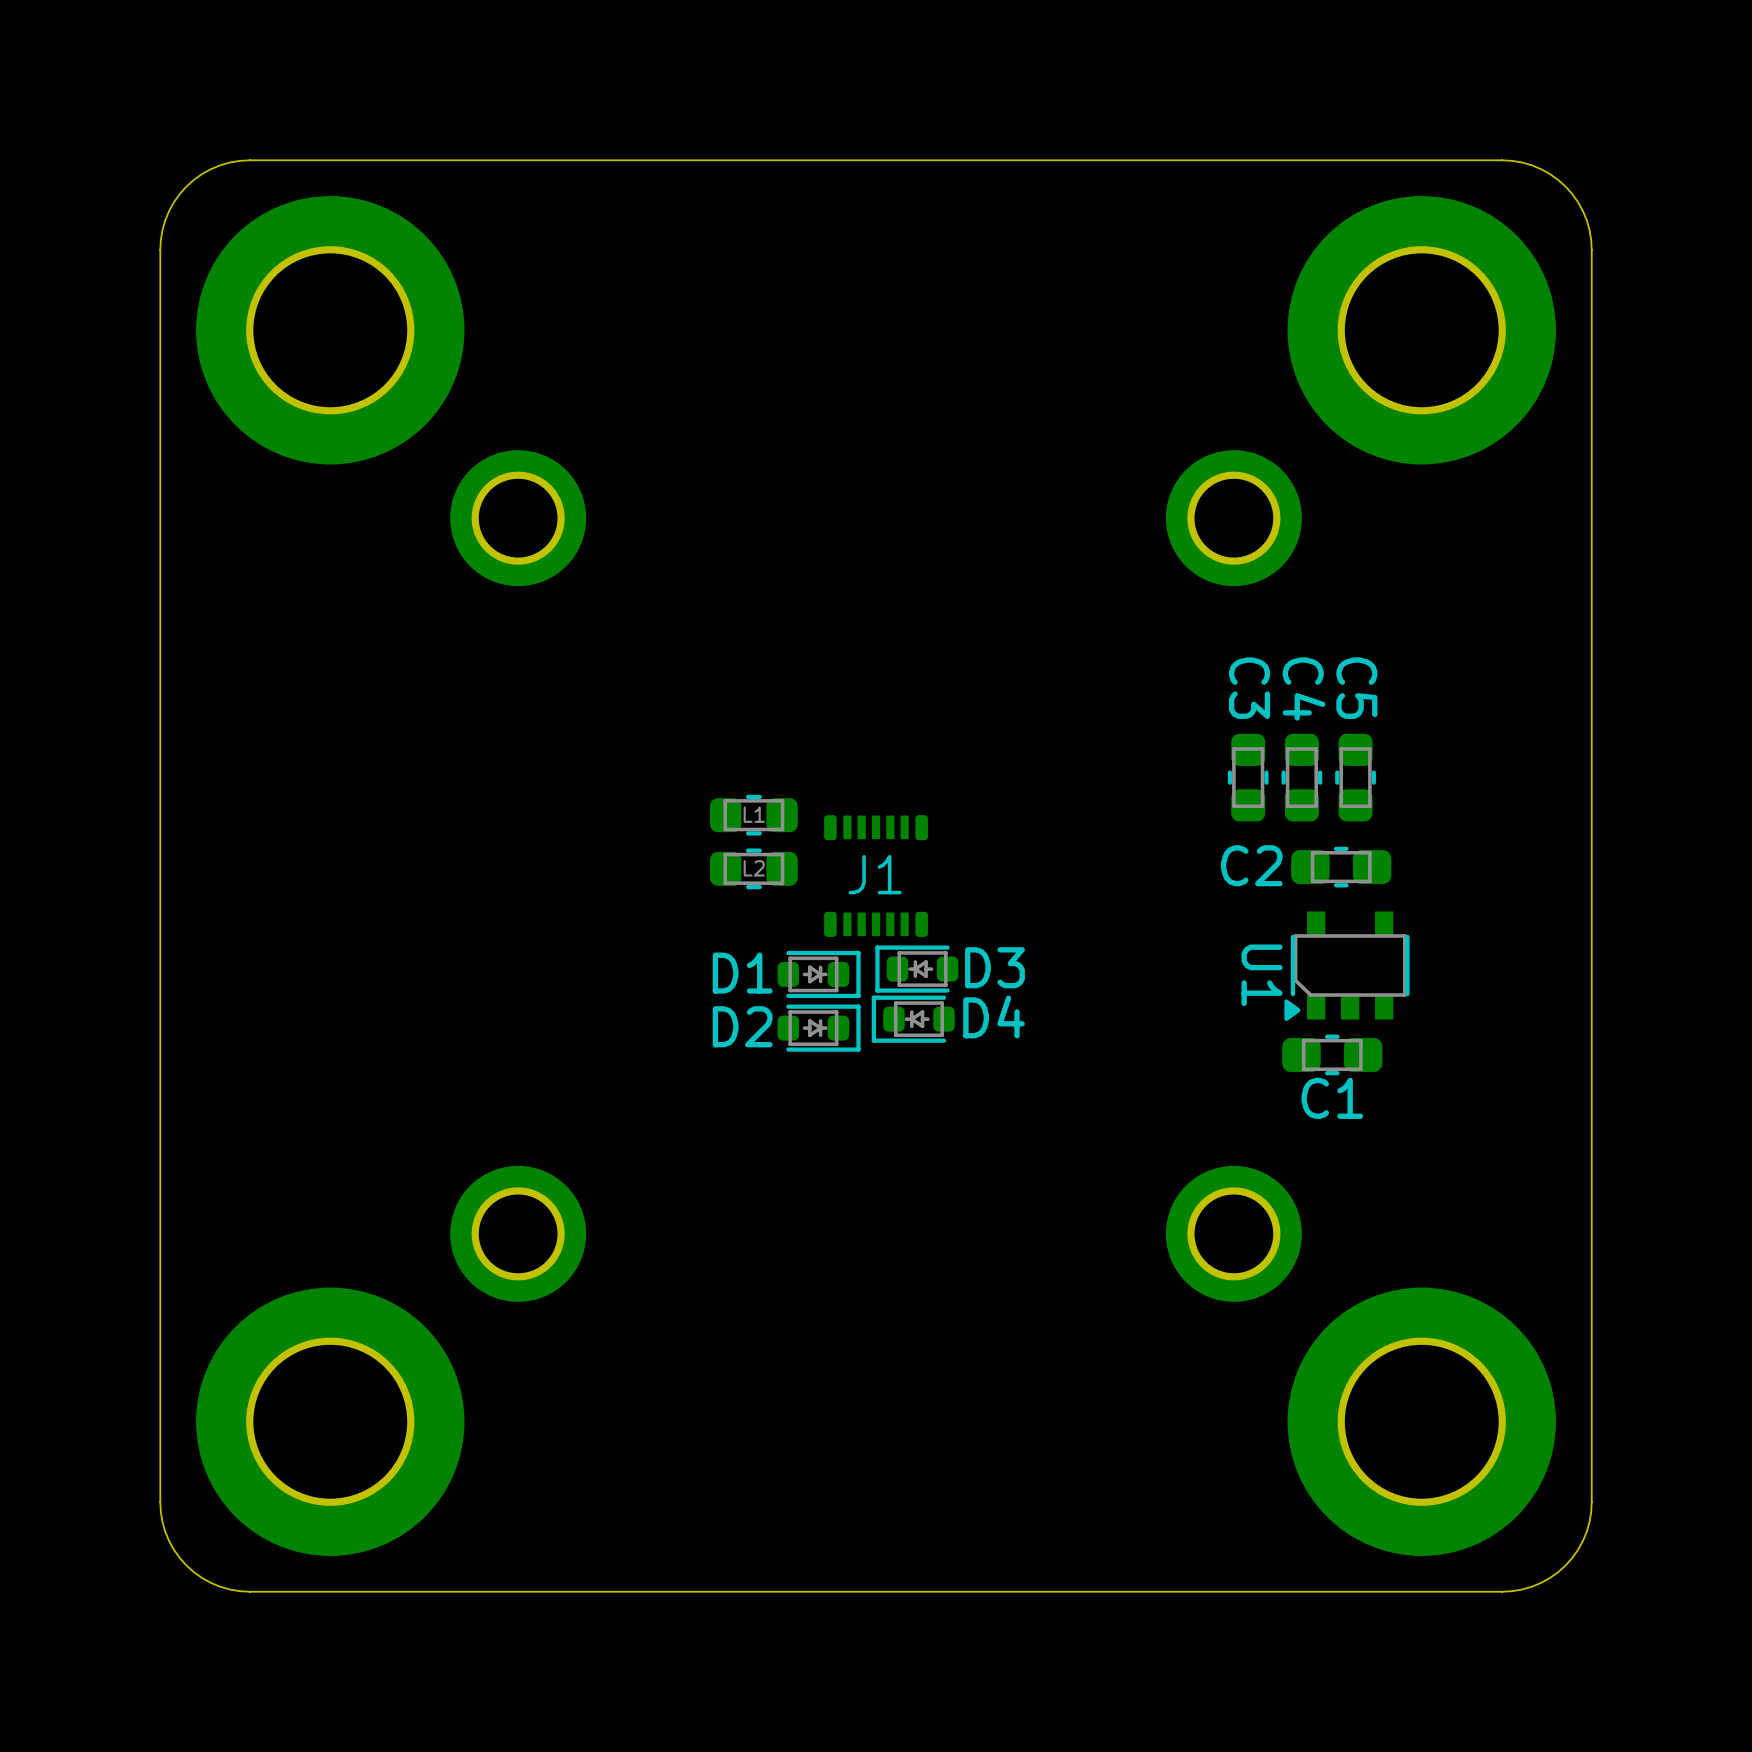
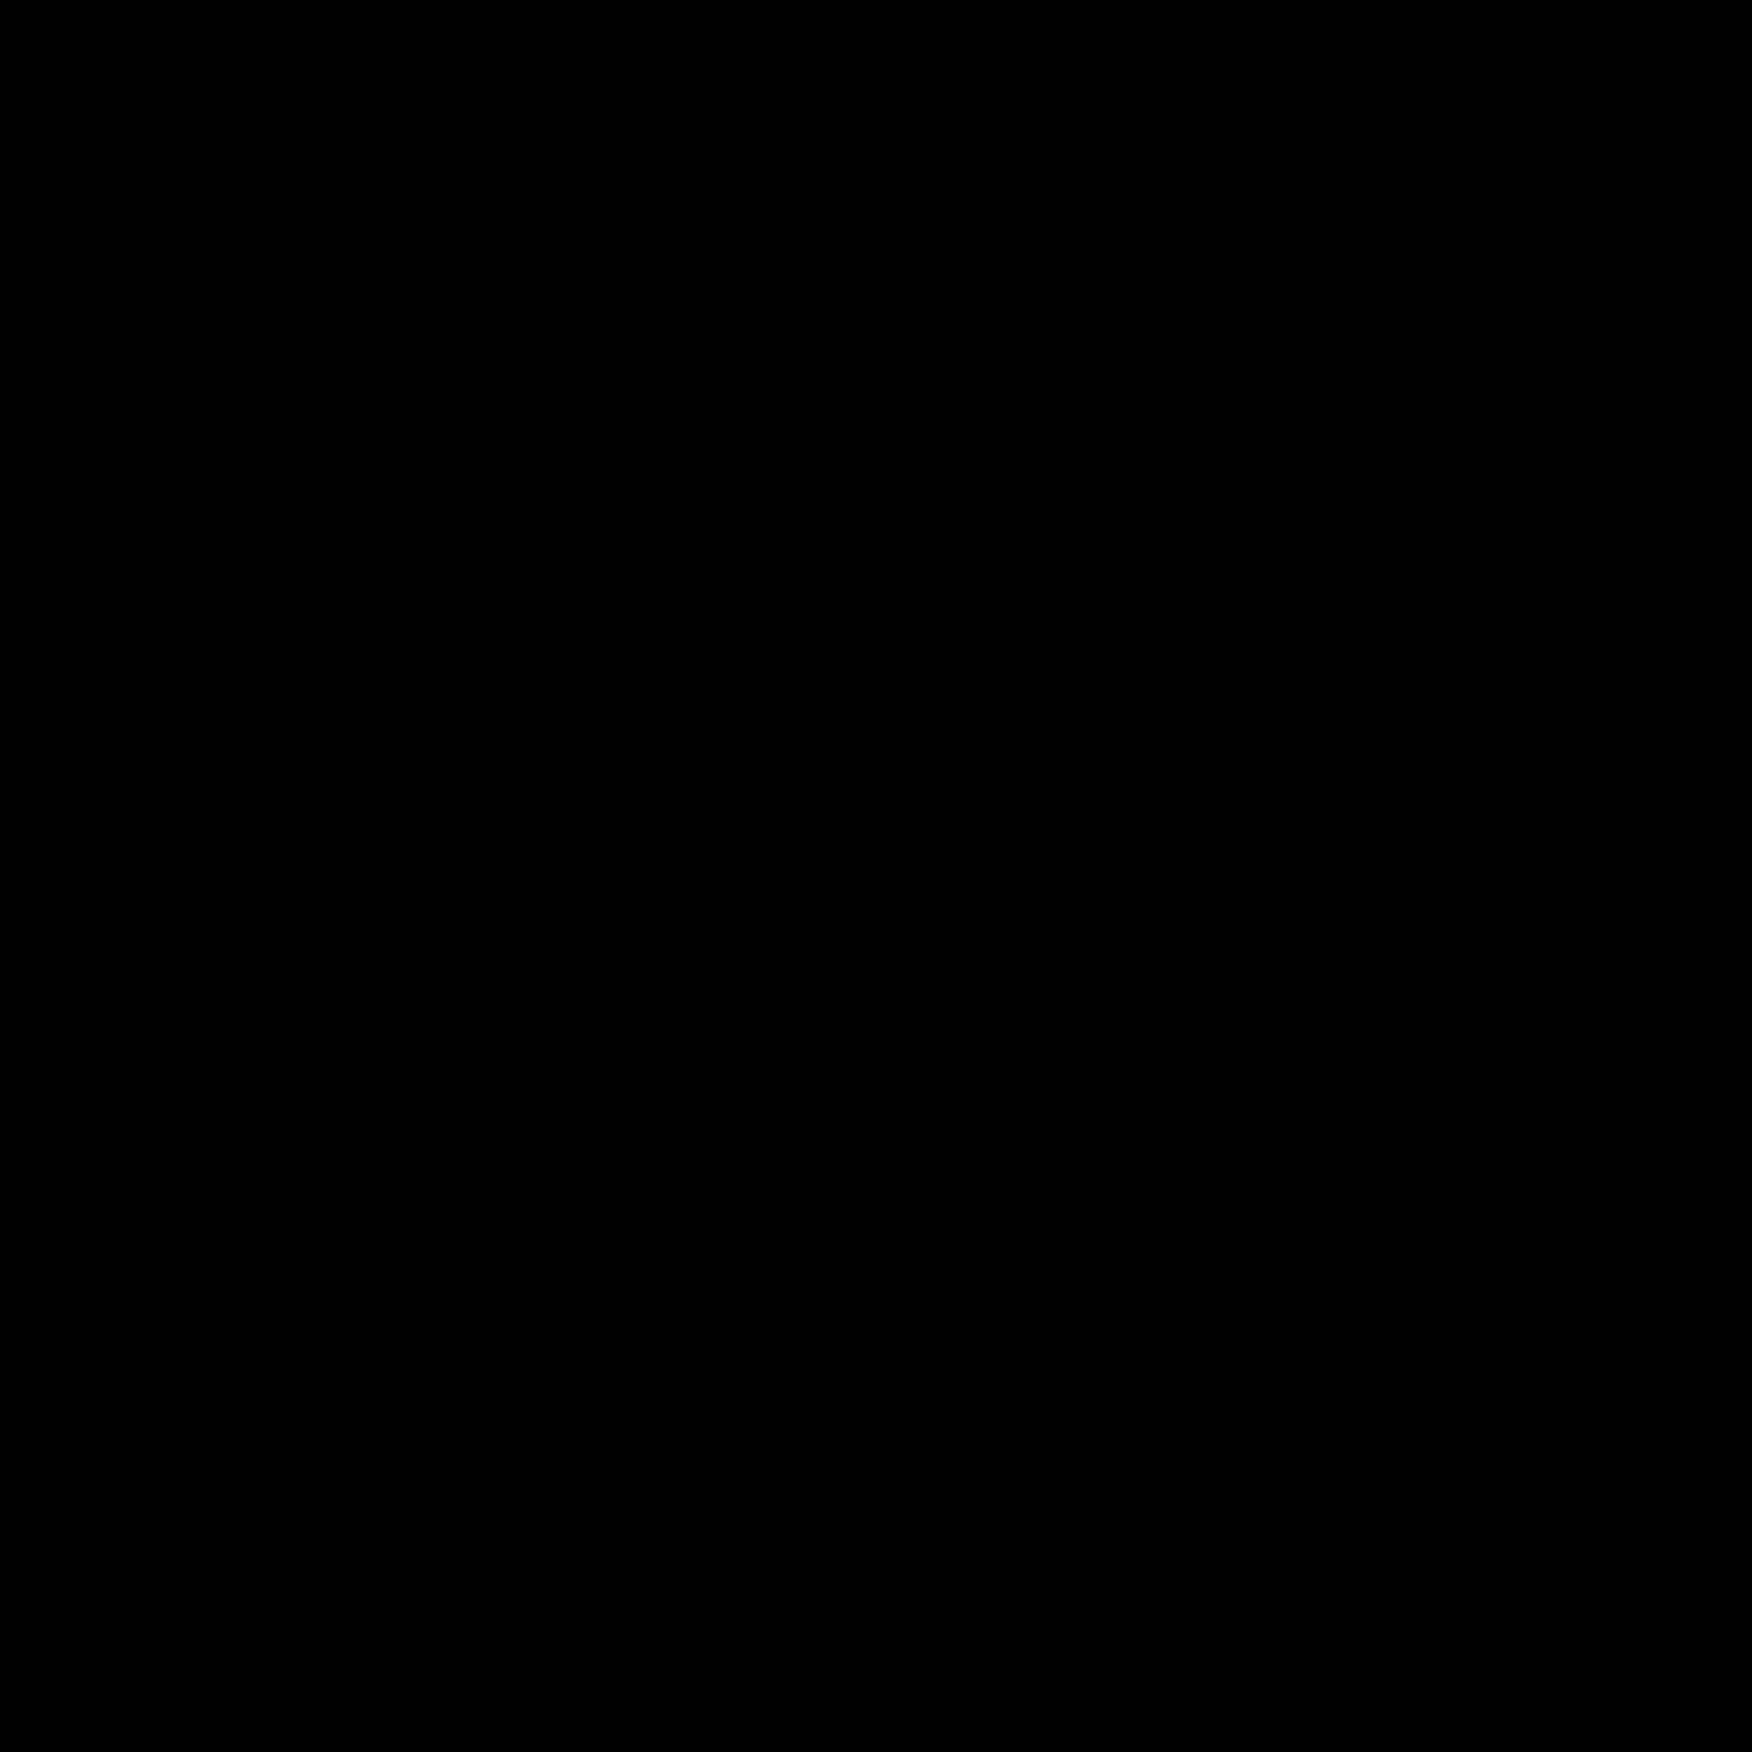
board edge: (1502, 160) (249, 160) (220, 165) (202, 174) (186, 186) (169, 210) (162, 229) (160, 249) (160, 1502) (165, 1531) (174, 1549) (186, 1565) (202, 1578) (220, 1586) (249, 1591) (1502, 1591) (1531, 1586) (1549, 1578) (1565, 1565) (1582, 1541) (1589, 1522) (1591, 1502) (1591, 249) (1589, 229) (1582, 210) (1565, 186) (1549, 174) (1531, 165) (1502, 160) -> none
part: (330, 330) -> none
part: (1421, 330) -> none
part: (518, 518) -> none
part: (1233, 518) -> none
C3: (1248, 777) -> none
C4: (1301, 777) -> none
C5: (1355, 777) -> none
L1: (753, 815) -> none
C2: (1341, 867) -> none
L2: (753, 868) -> none
J1: (876, 876) -> none
U1: (1346, 966) -> none
D3: (916, 969) -> none
D1: (819, 974) -> none
D4: (913, 1019) -> none
D2: (819, 1028) -> none
C1: (1332, 1054) -> none
part: (518, 1233) -> none
part: (1233, 1233) -> none
part: (330, 1421) -> none
part: (1421, 1421) -> none

